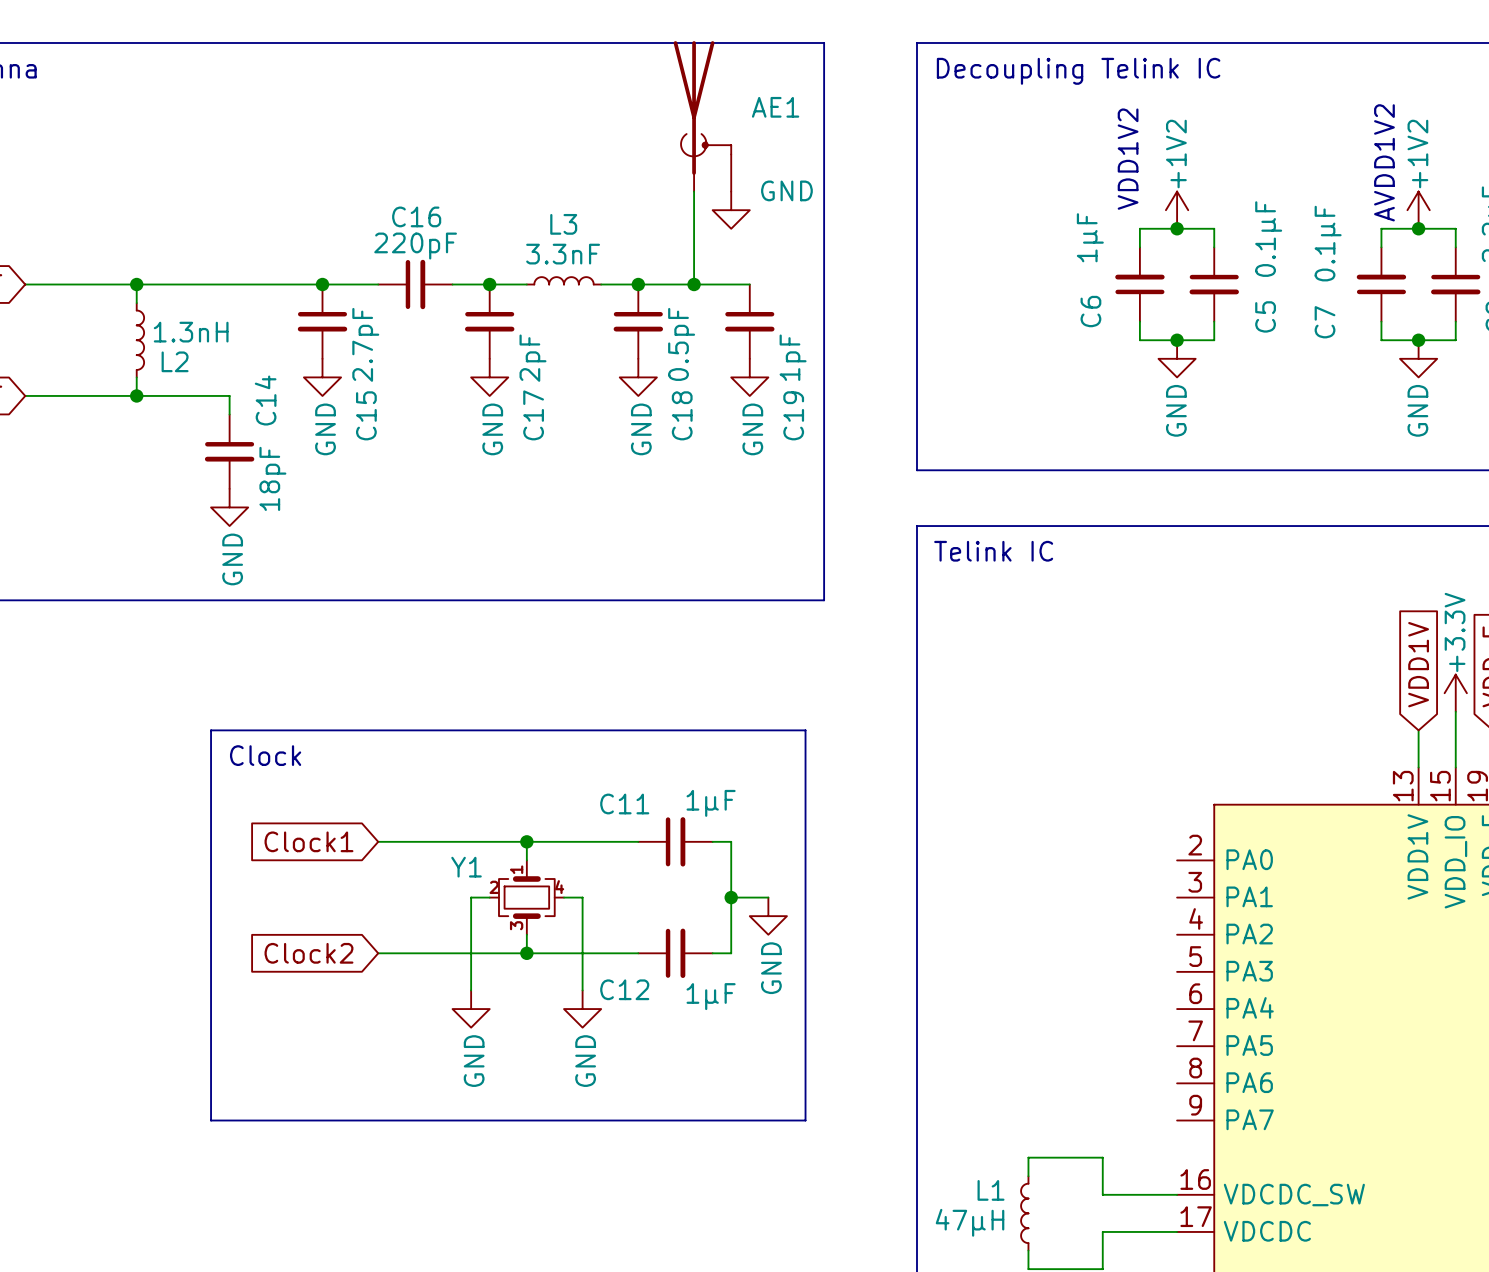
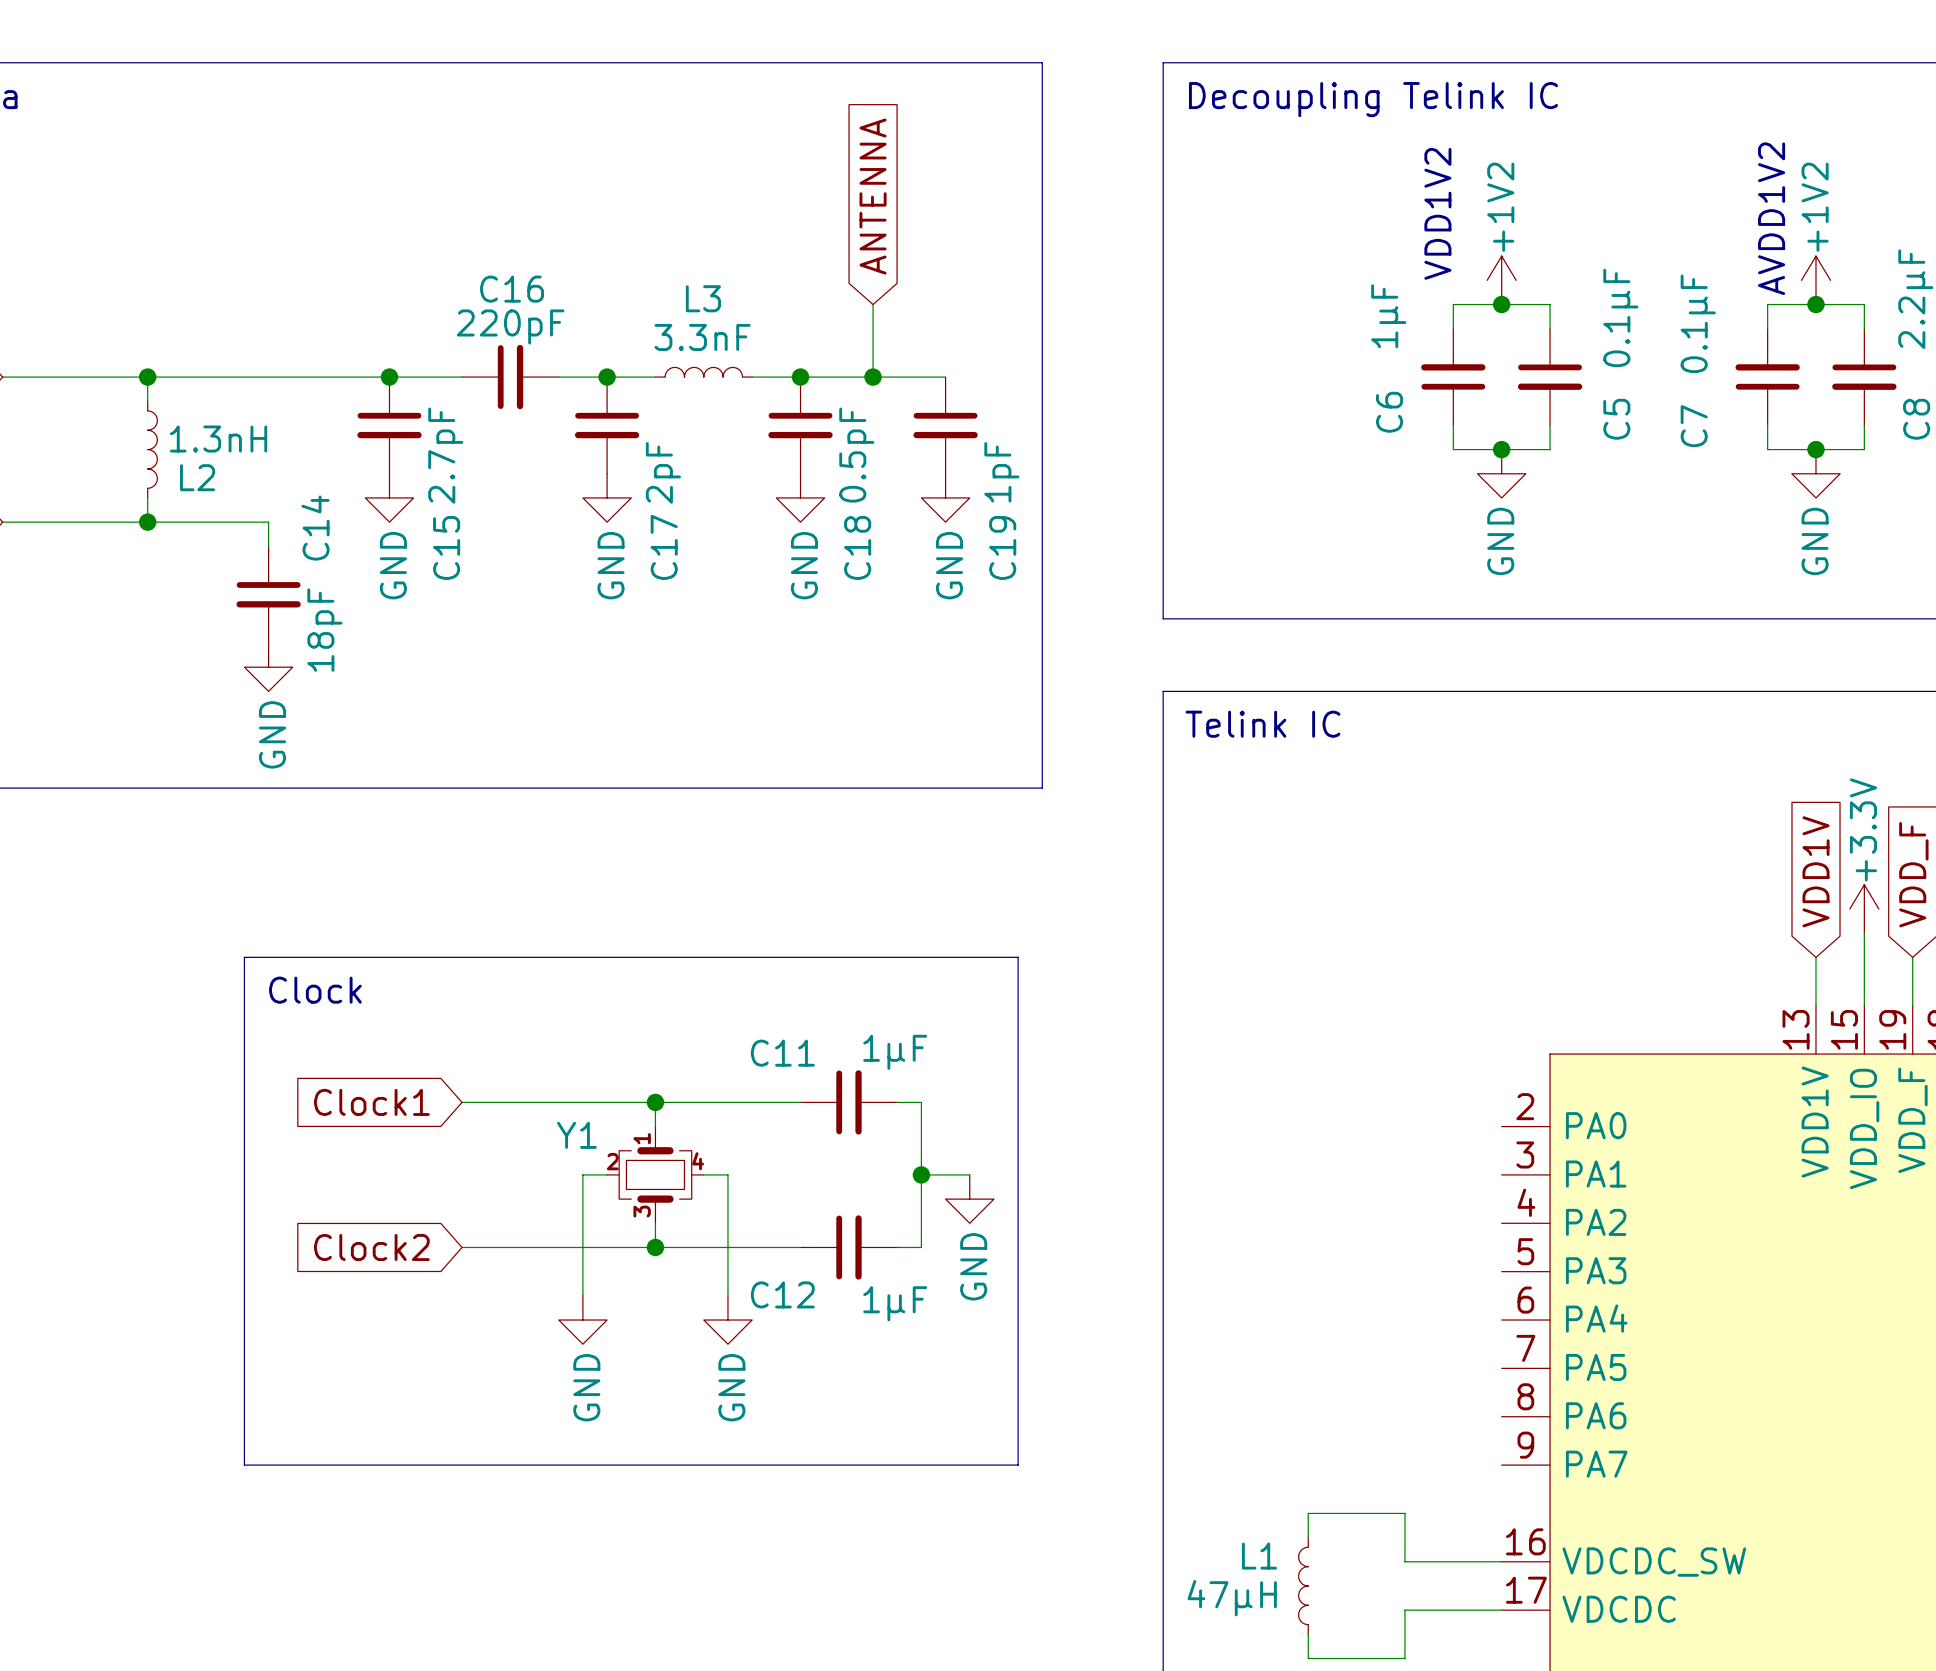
AE1: (702, 116) -> none
global label: none -> ANTENNA (873, 196)
wire: (694, 191) (694, 228) -> none
power symbol: GND (731, 210) -> none

